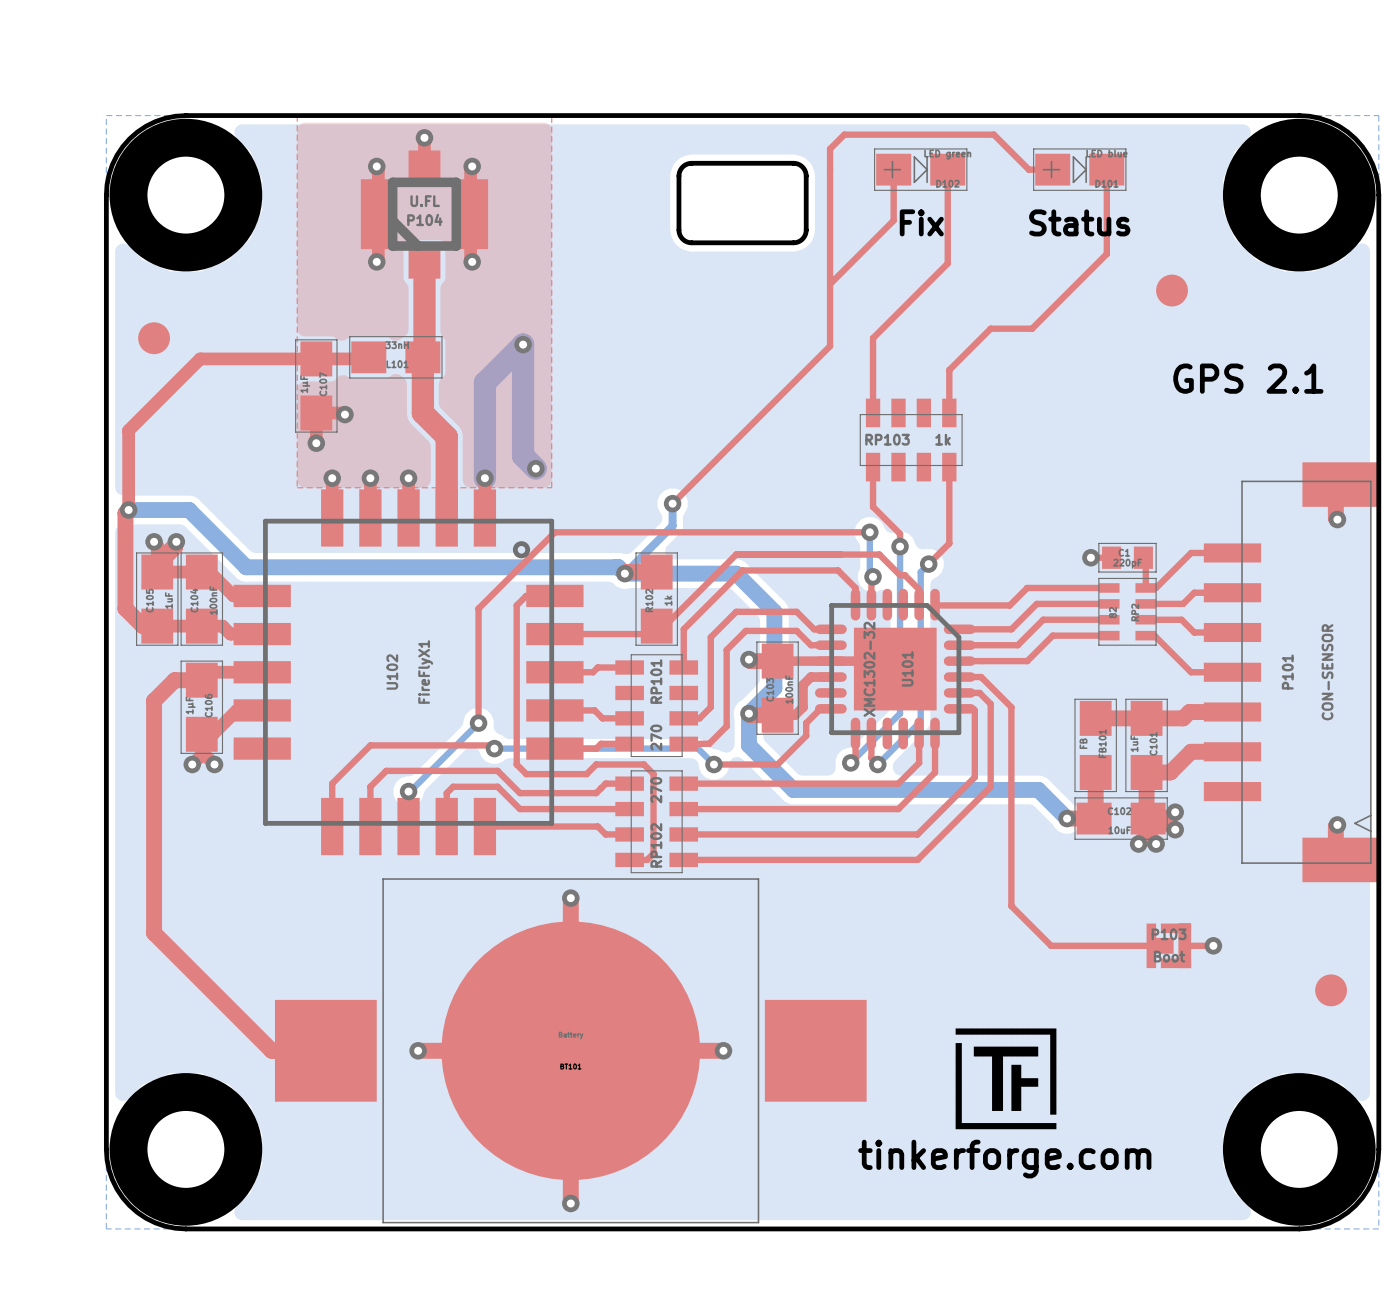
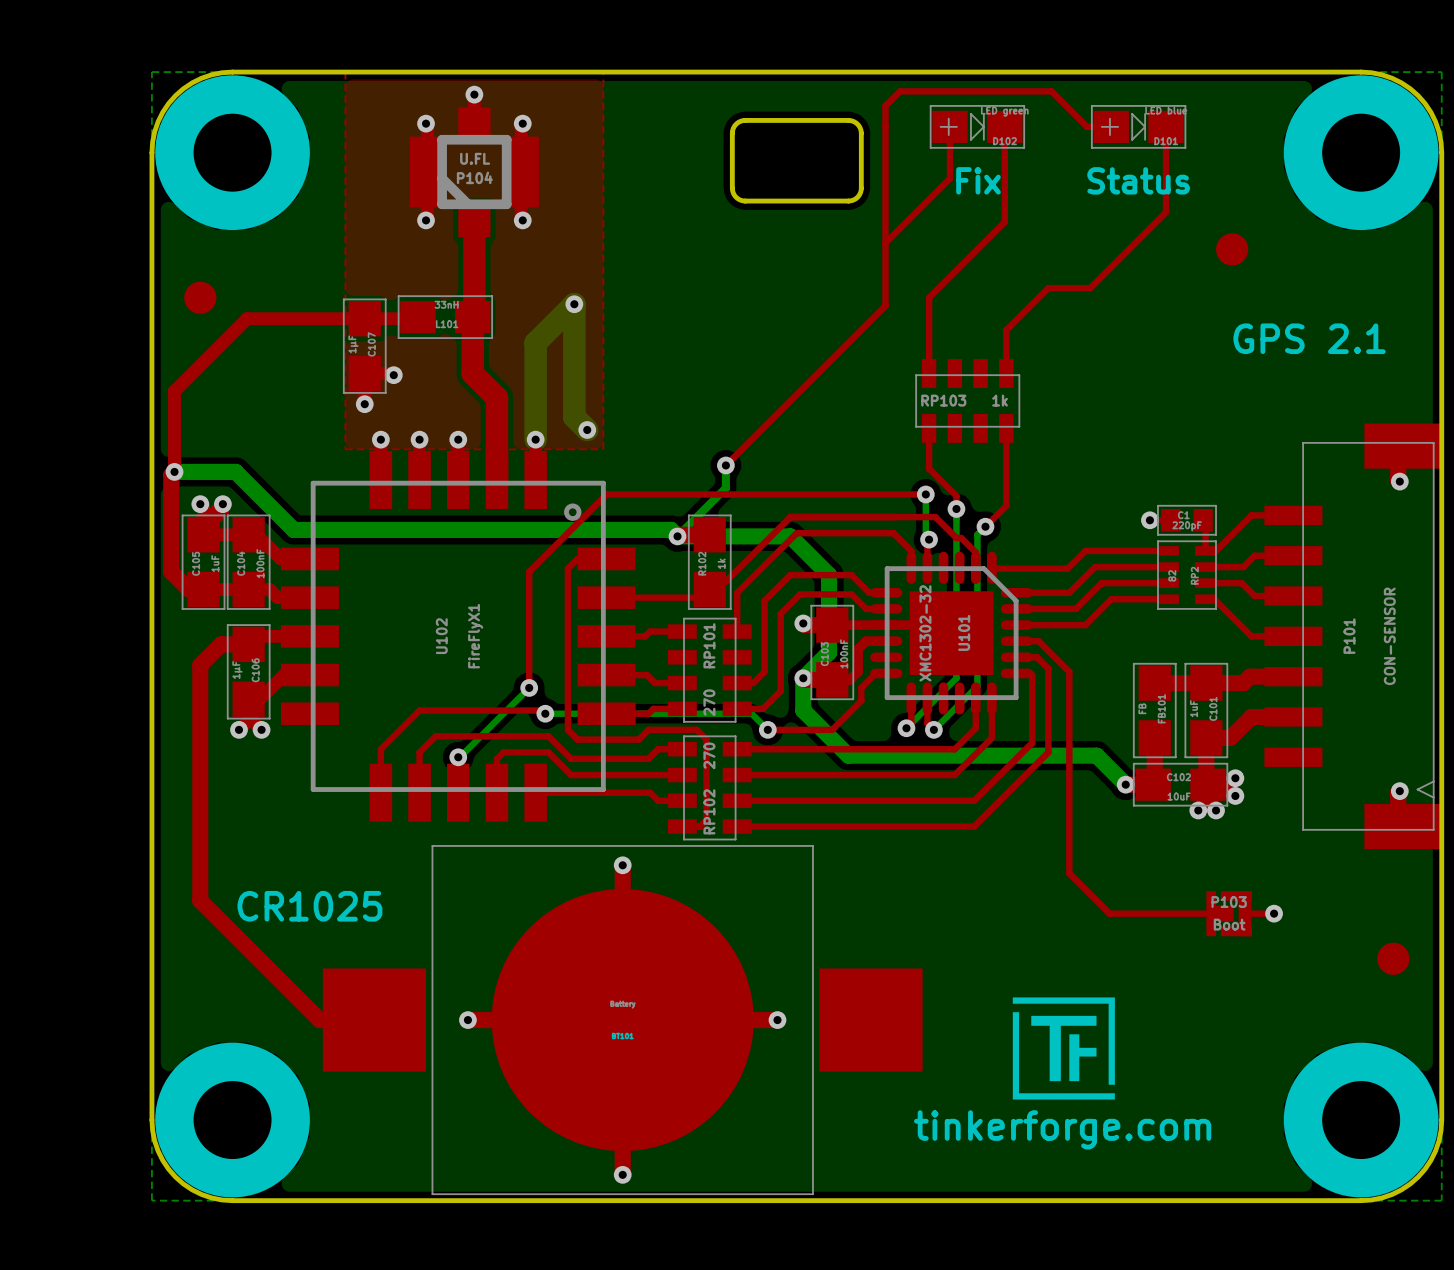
text: none -> CR1025 (309, 906)

